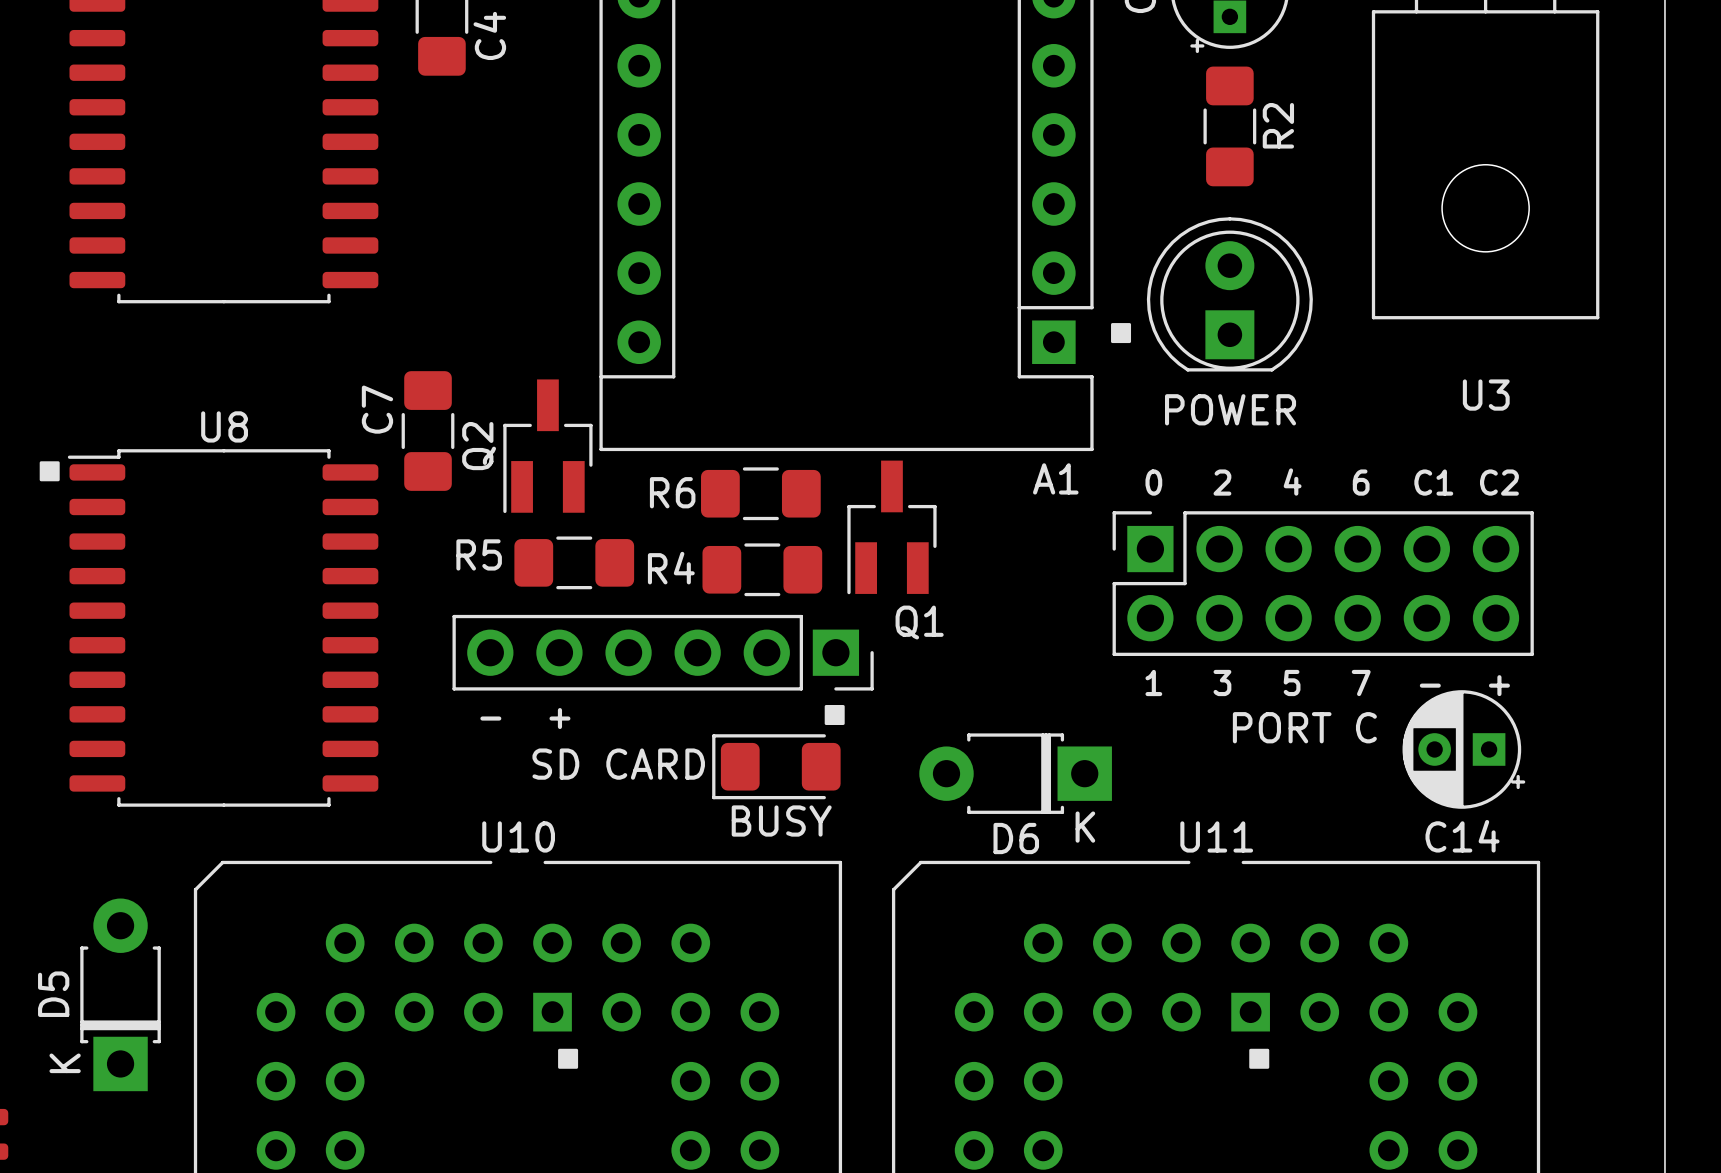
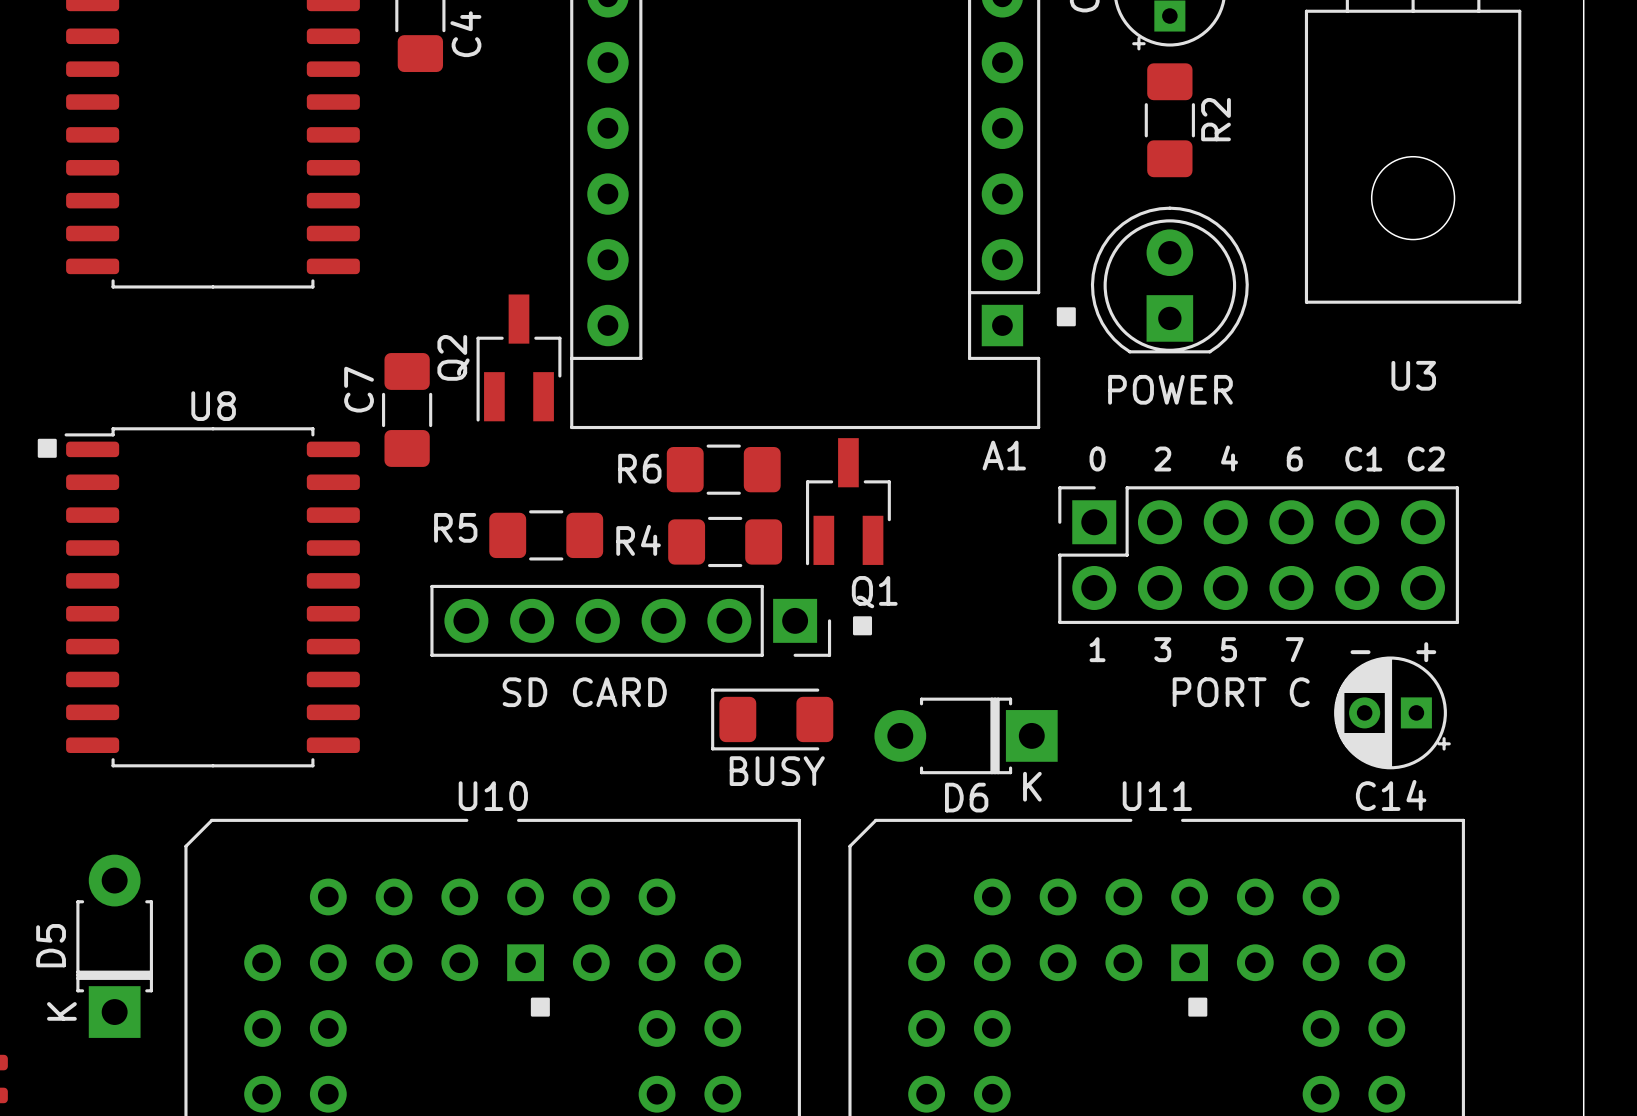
Q2 position: (547, 446) -> (518, 358)
drawing position: (834, 714) -> (862, 625)
text: - (490, 718) -> none
text: + (559, 718) -> none
SD CARD name position: SD CARD (618, 764) -> SD CARD (584, 692)
BUSY position: (776, 766) -> (772, 719)

